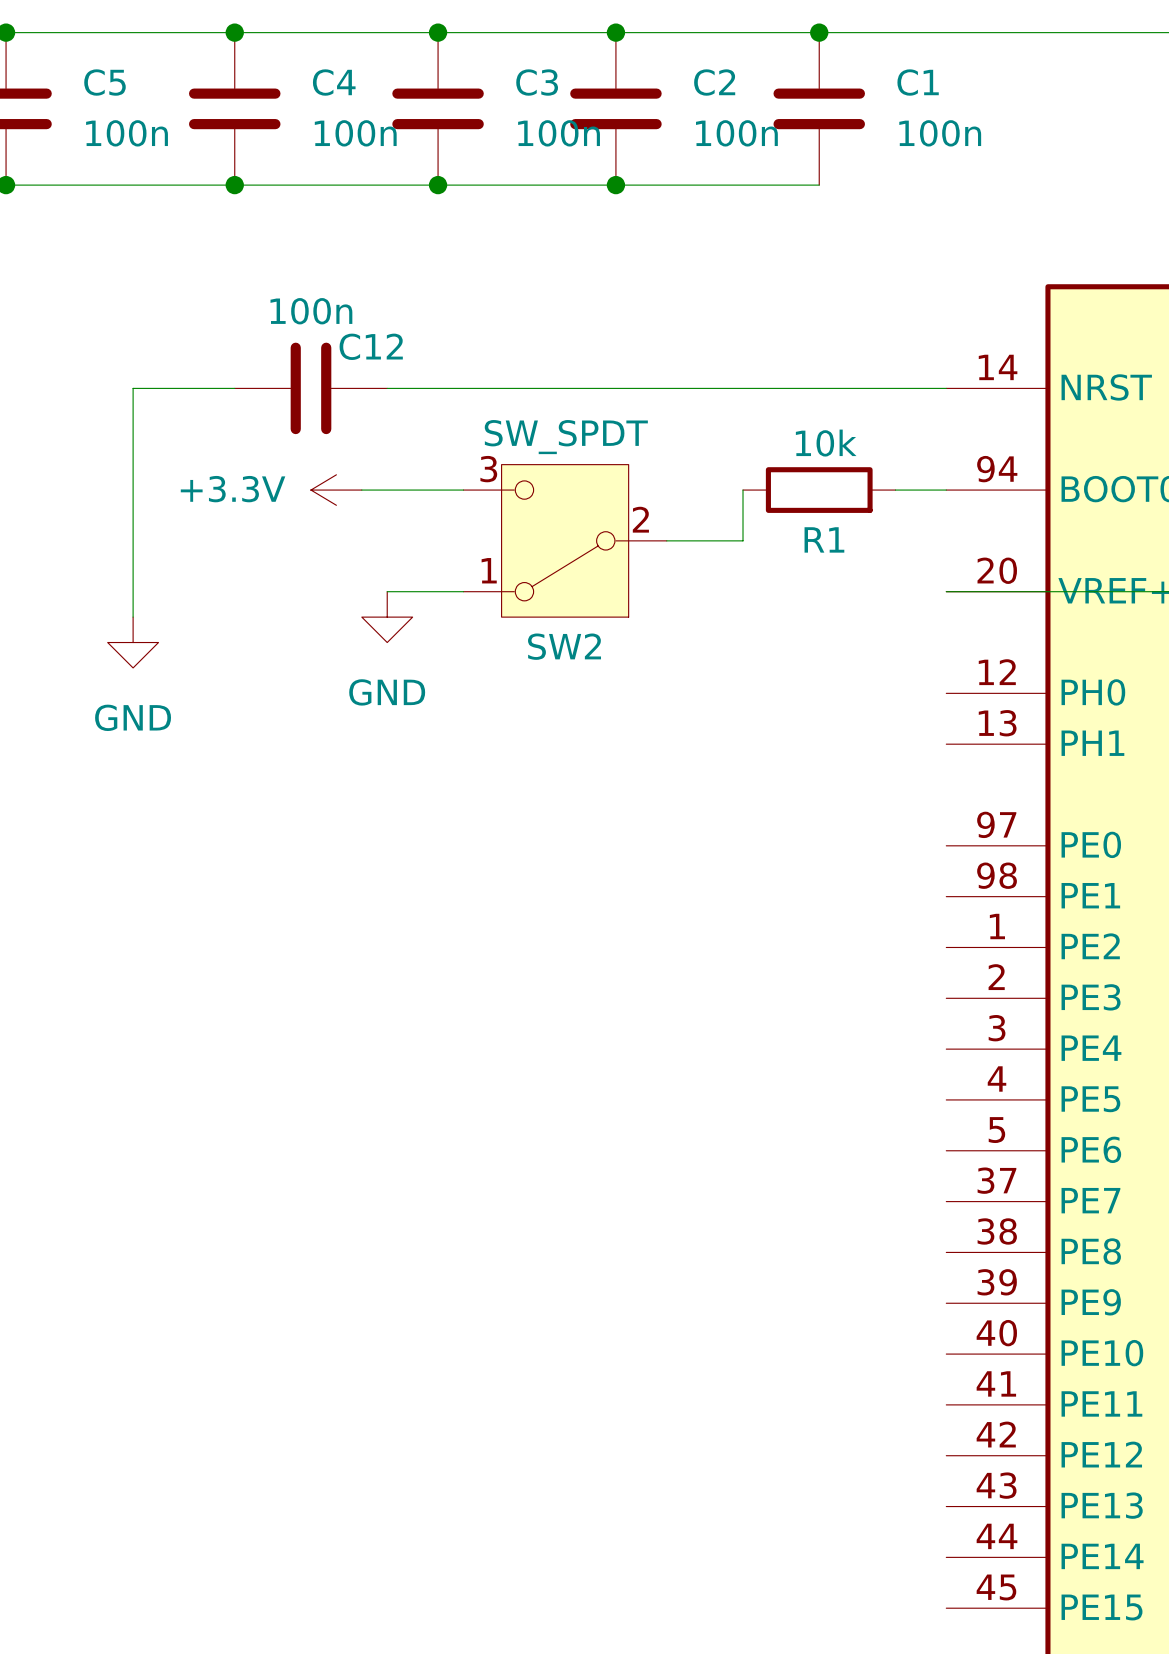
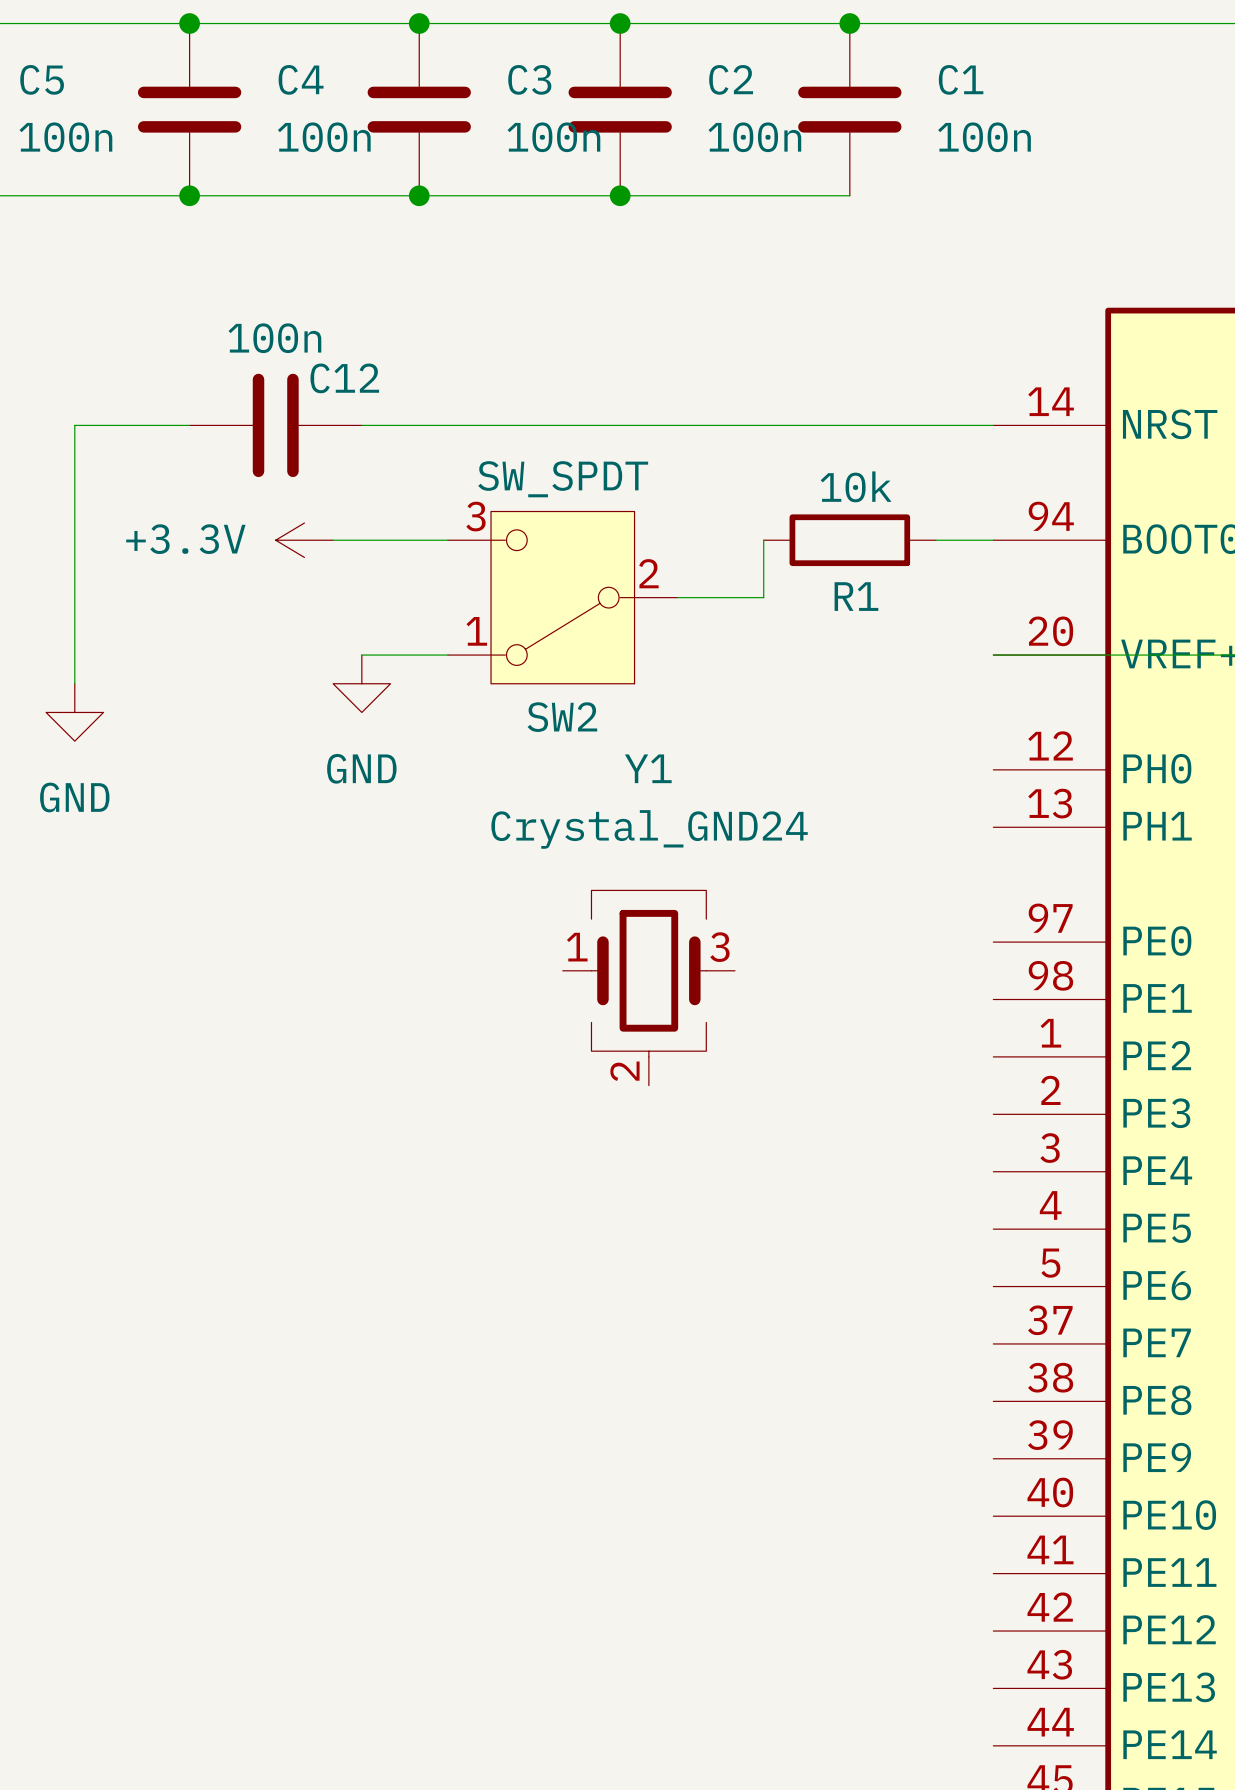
Y1: none -> Crystal_GND24 (648, 988)

